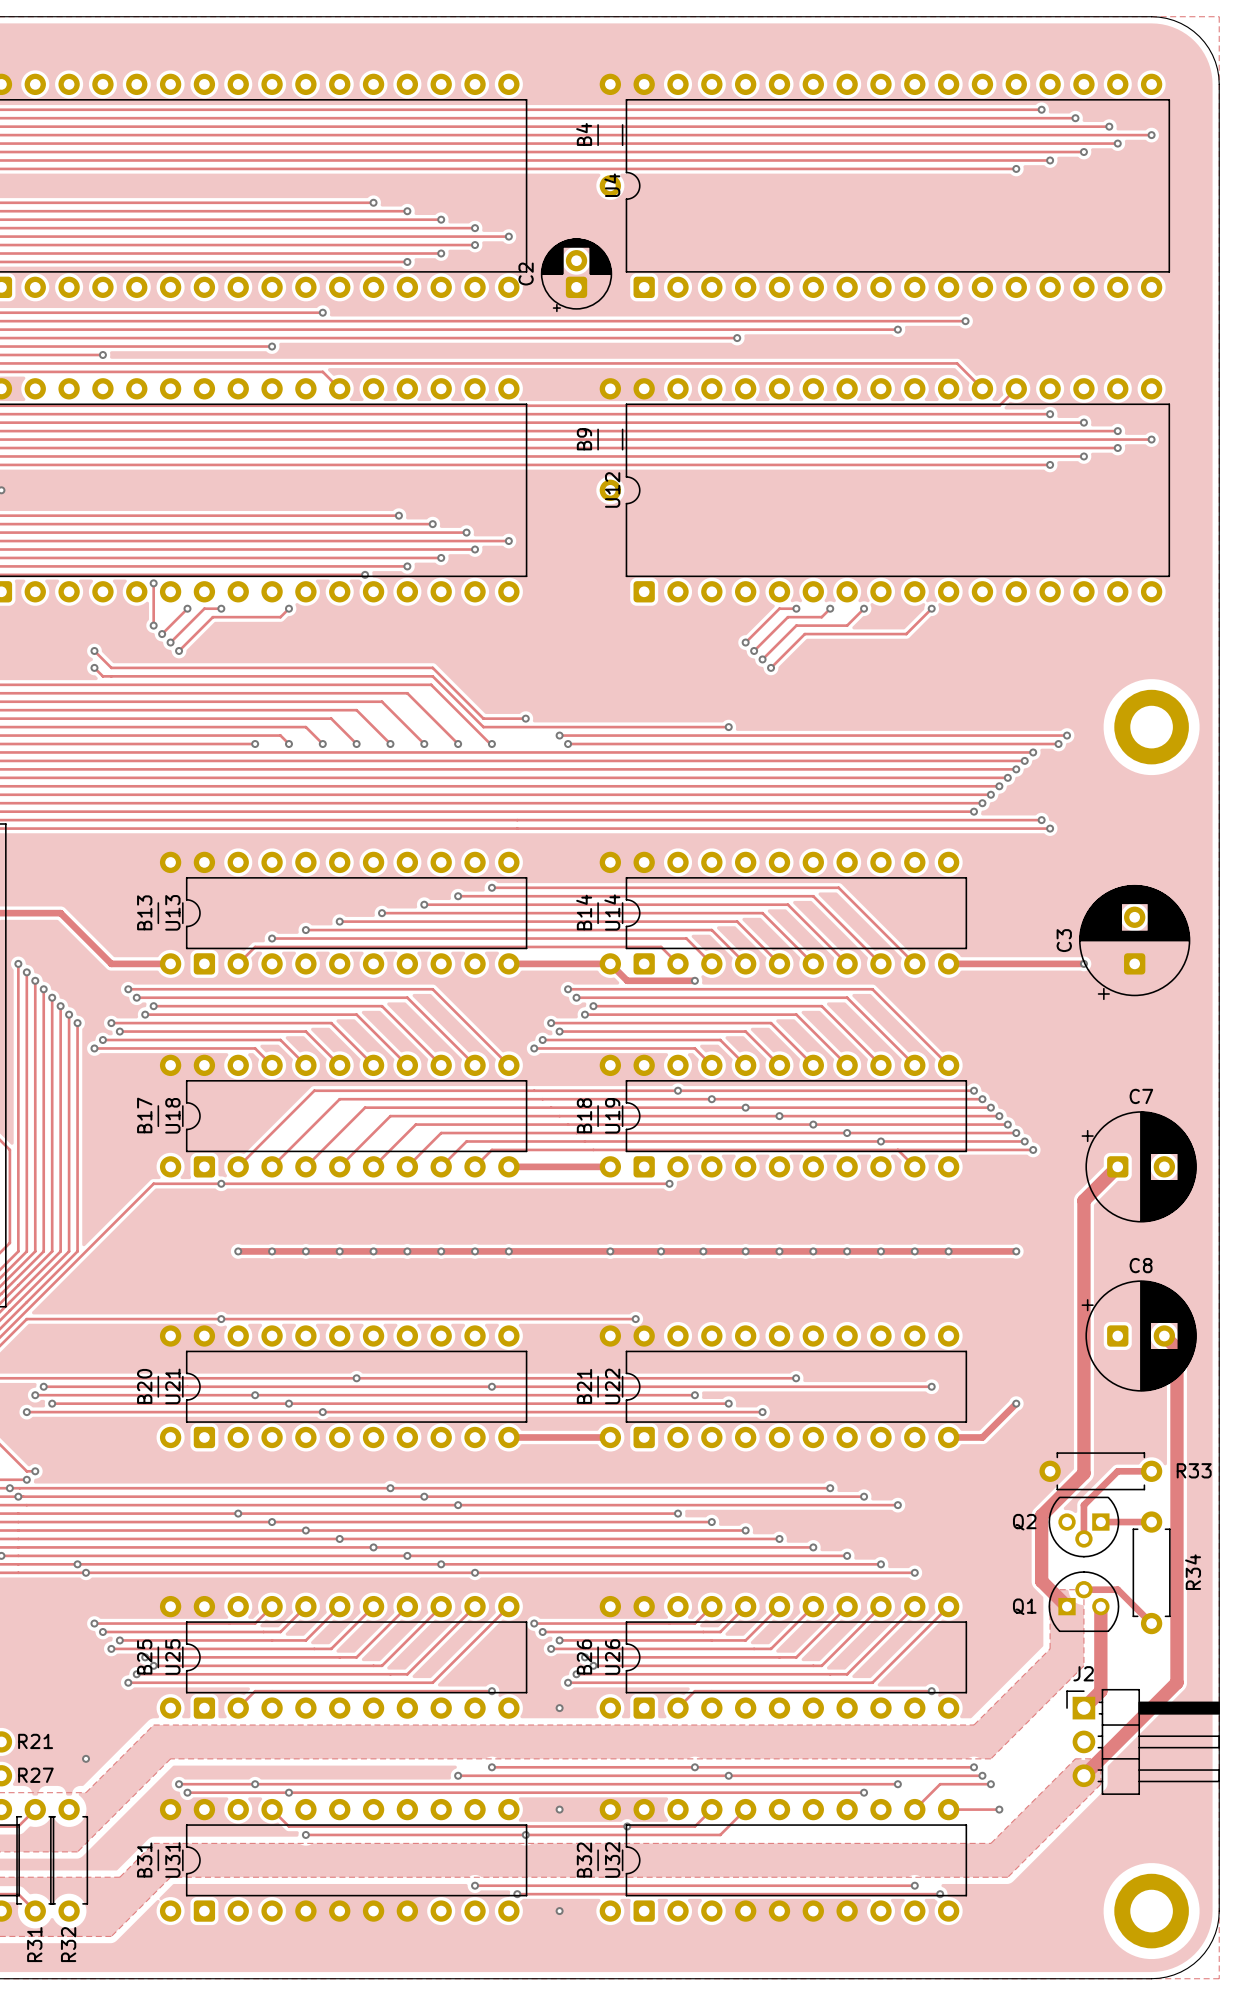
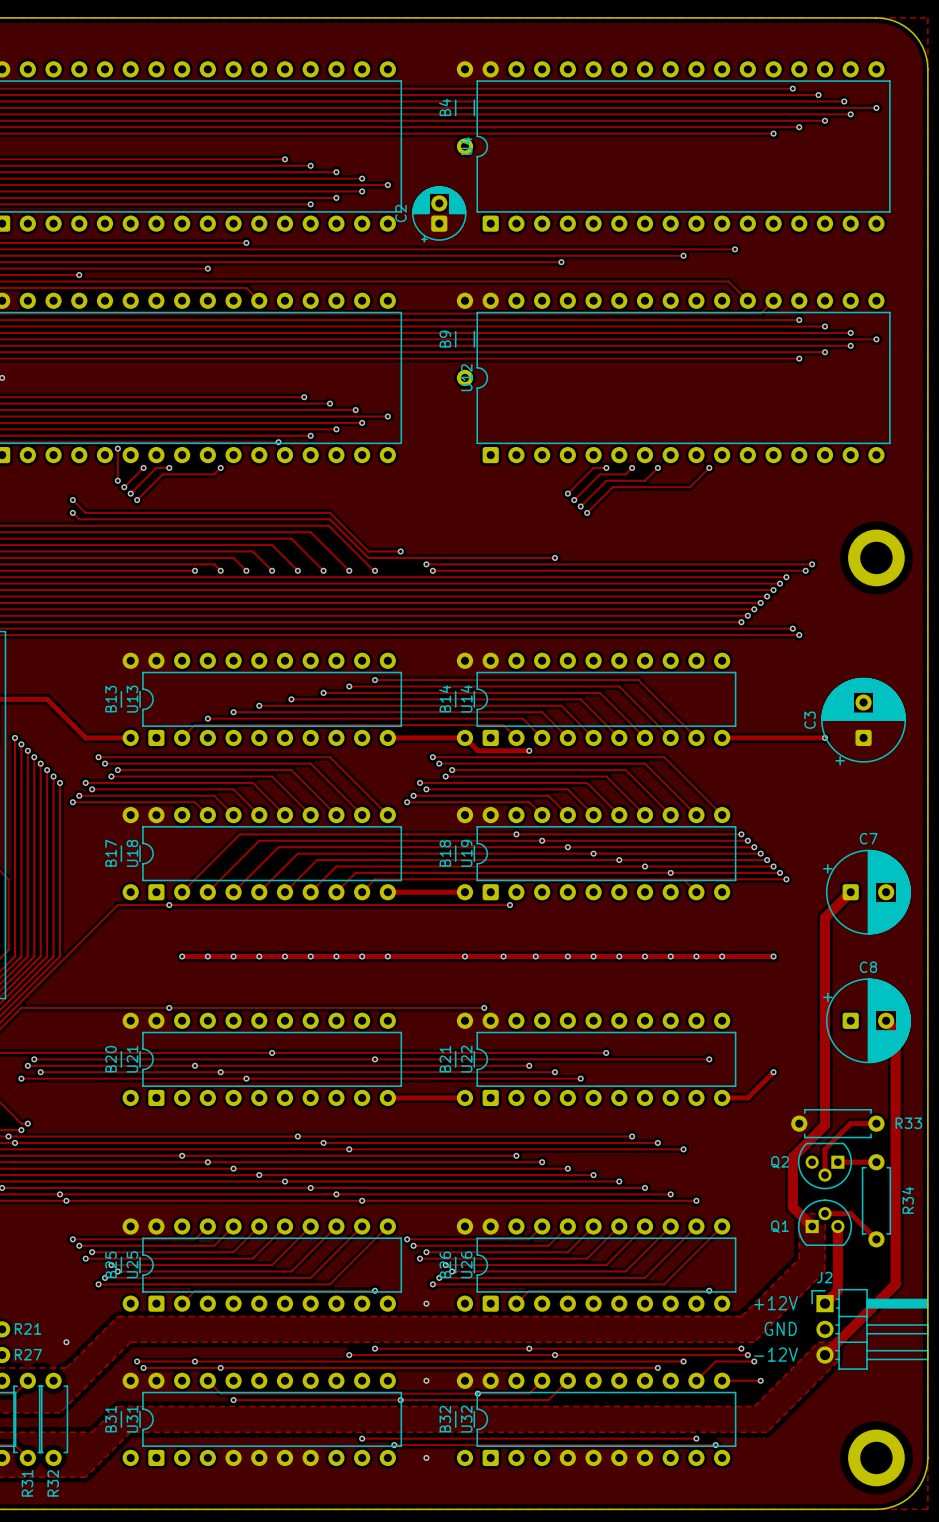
text: none -> +12V (776, 1303)
text: none -> GND (780, 1328)
text: none -> -12V (776, 1354)

